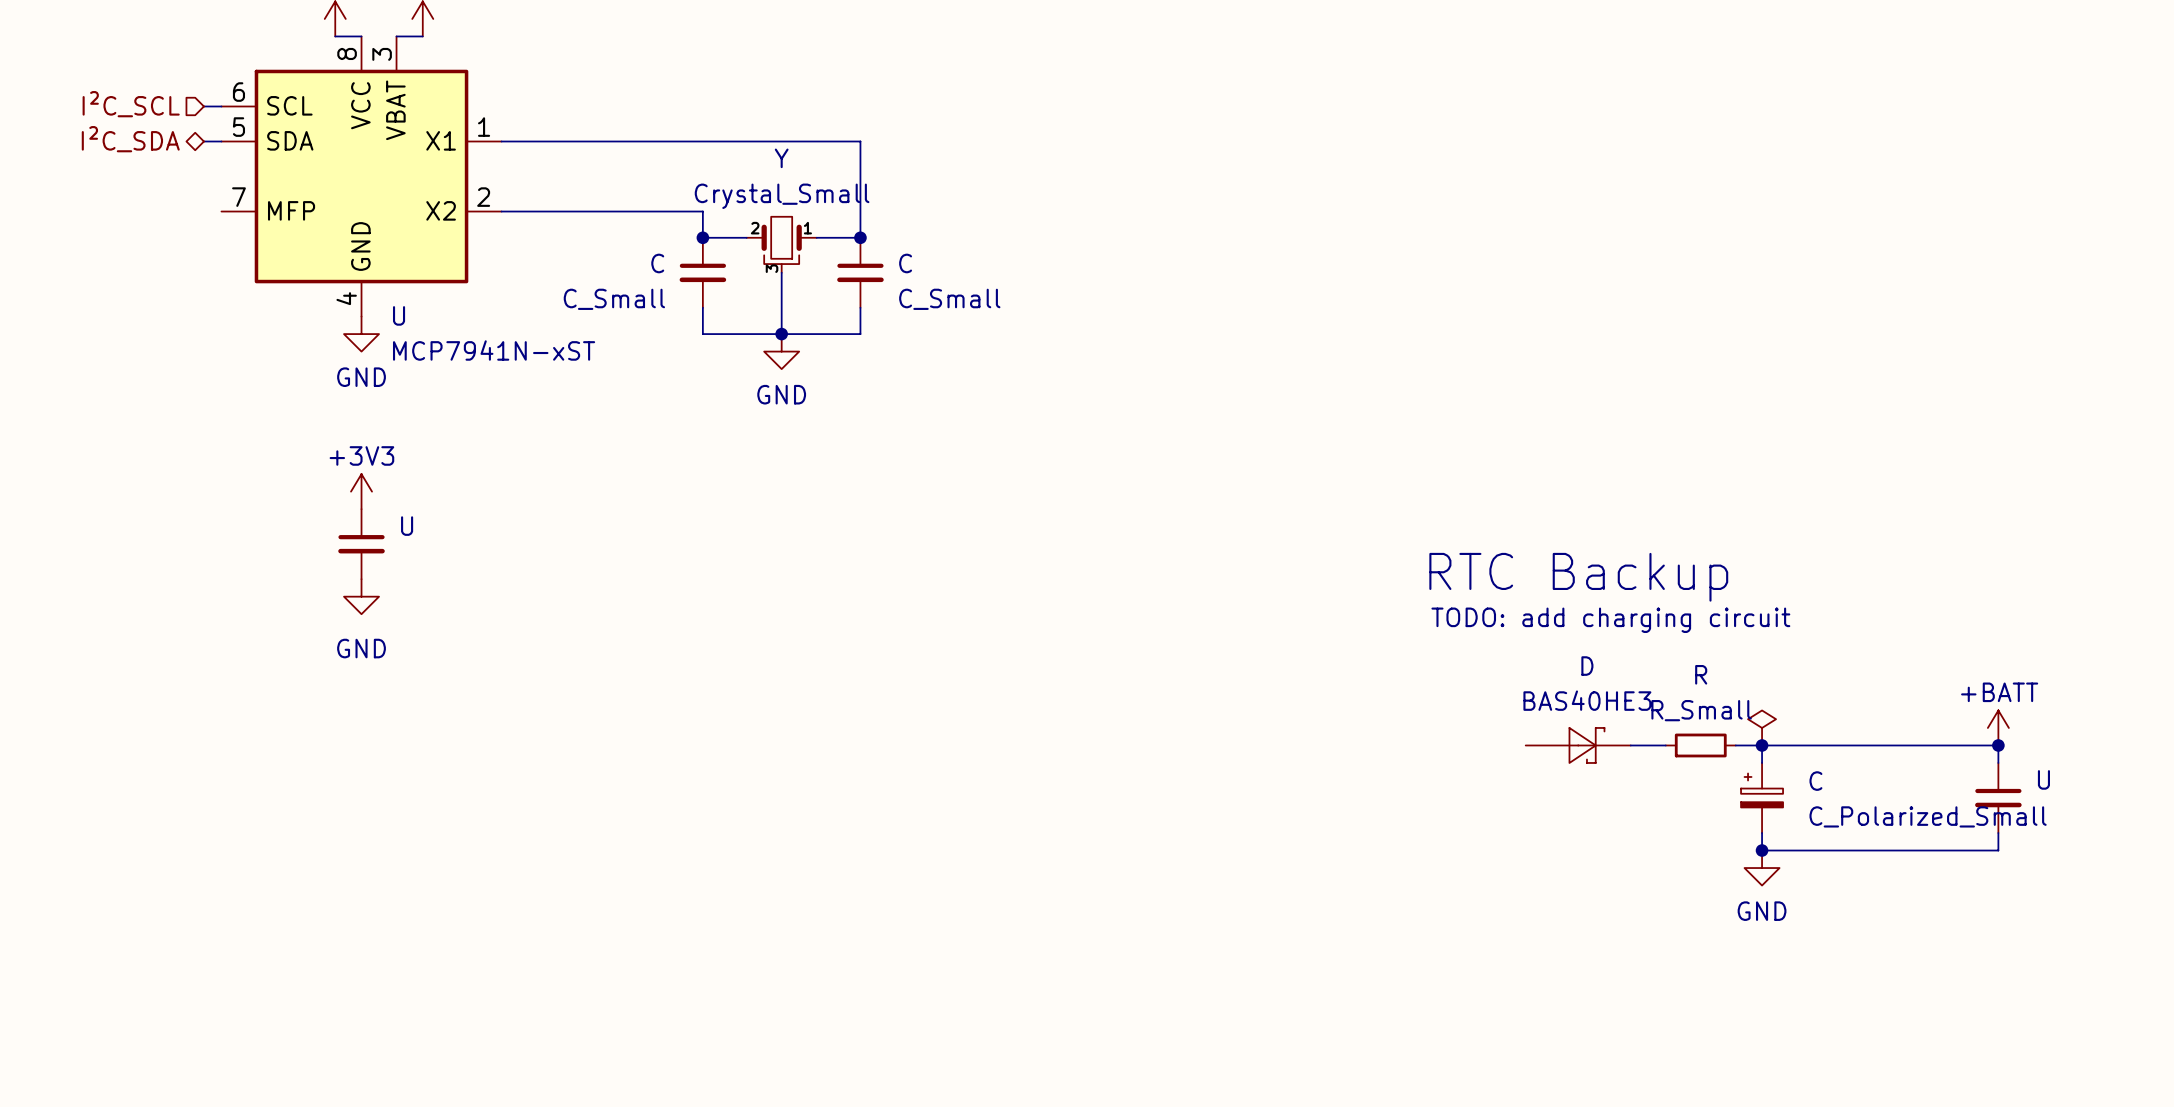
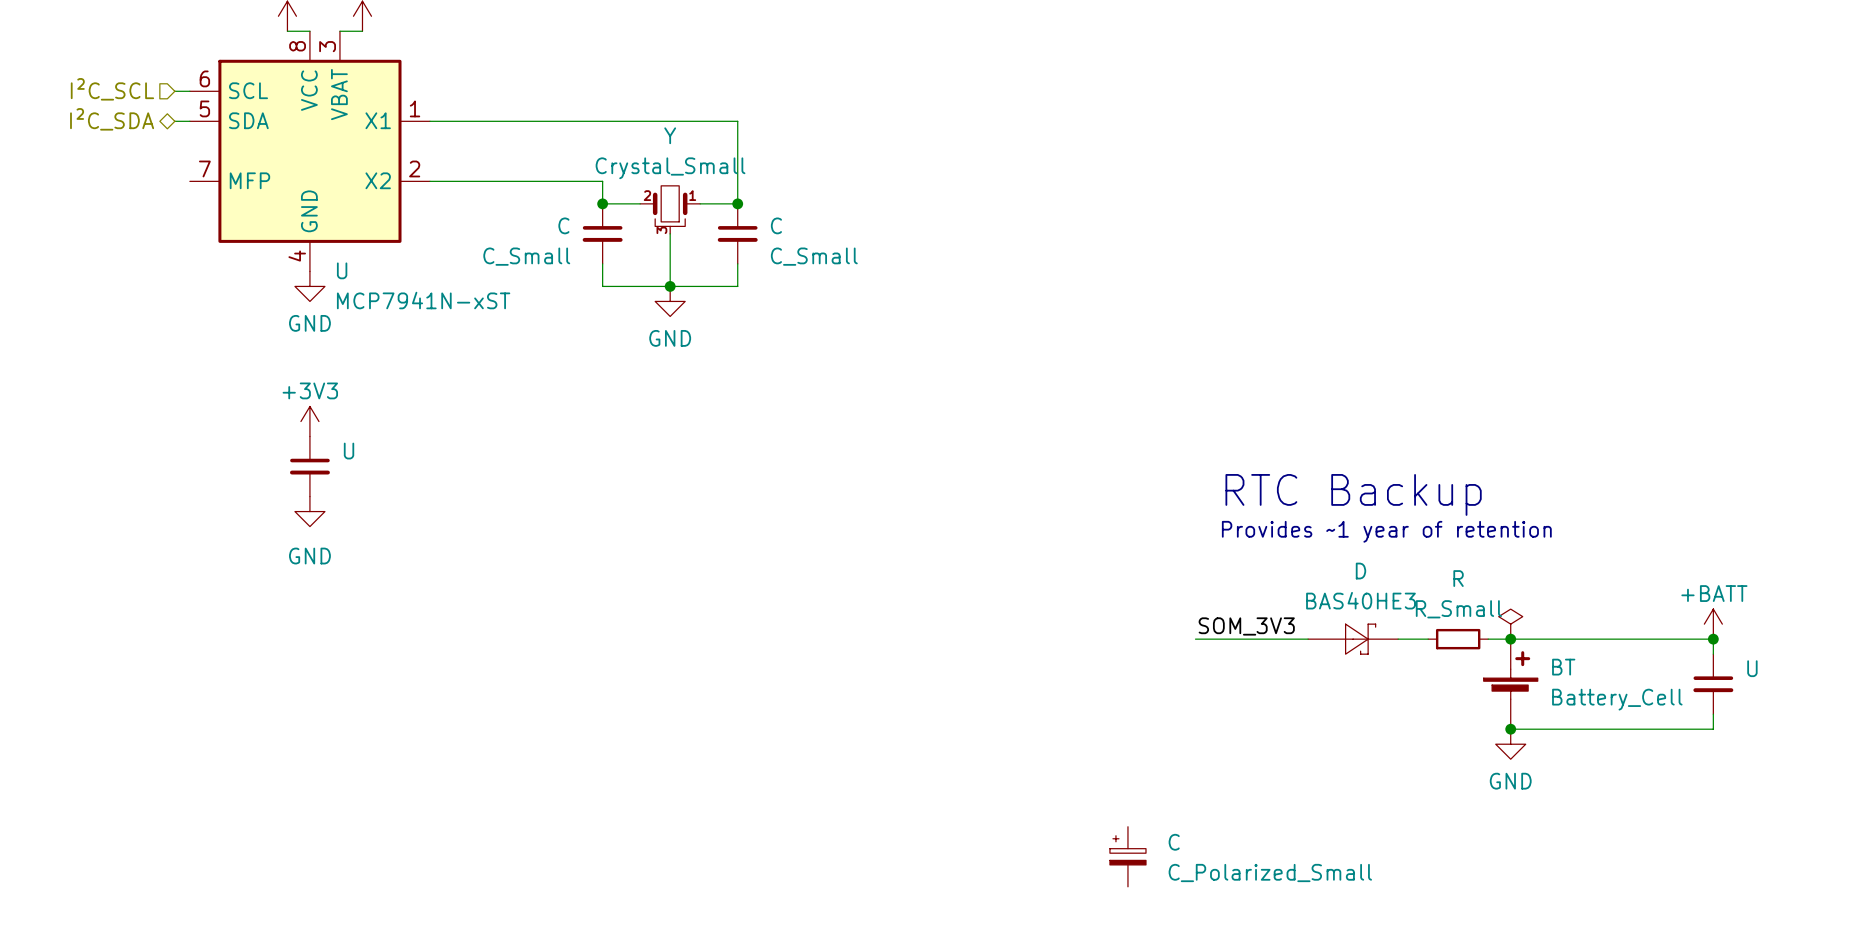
text: TODO: add charging circuit (1610, 620) -> Provides ~1 year of retention (1386, 531)
label: none -> SOM_3V3 (1246, 626)
wire: none -> (1195, 639) (1308, 639)
C: C_Polarized_Small (1762, 798) -> none
BT: none -> Battery_Cell (1510, 684)
C: none -> C_Polarized_Small (1127, 856)

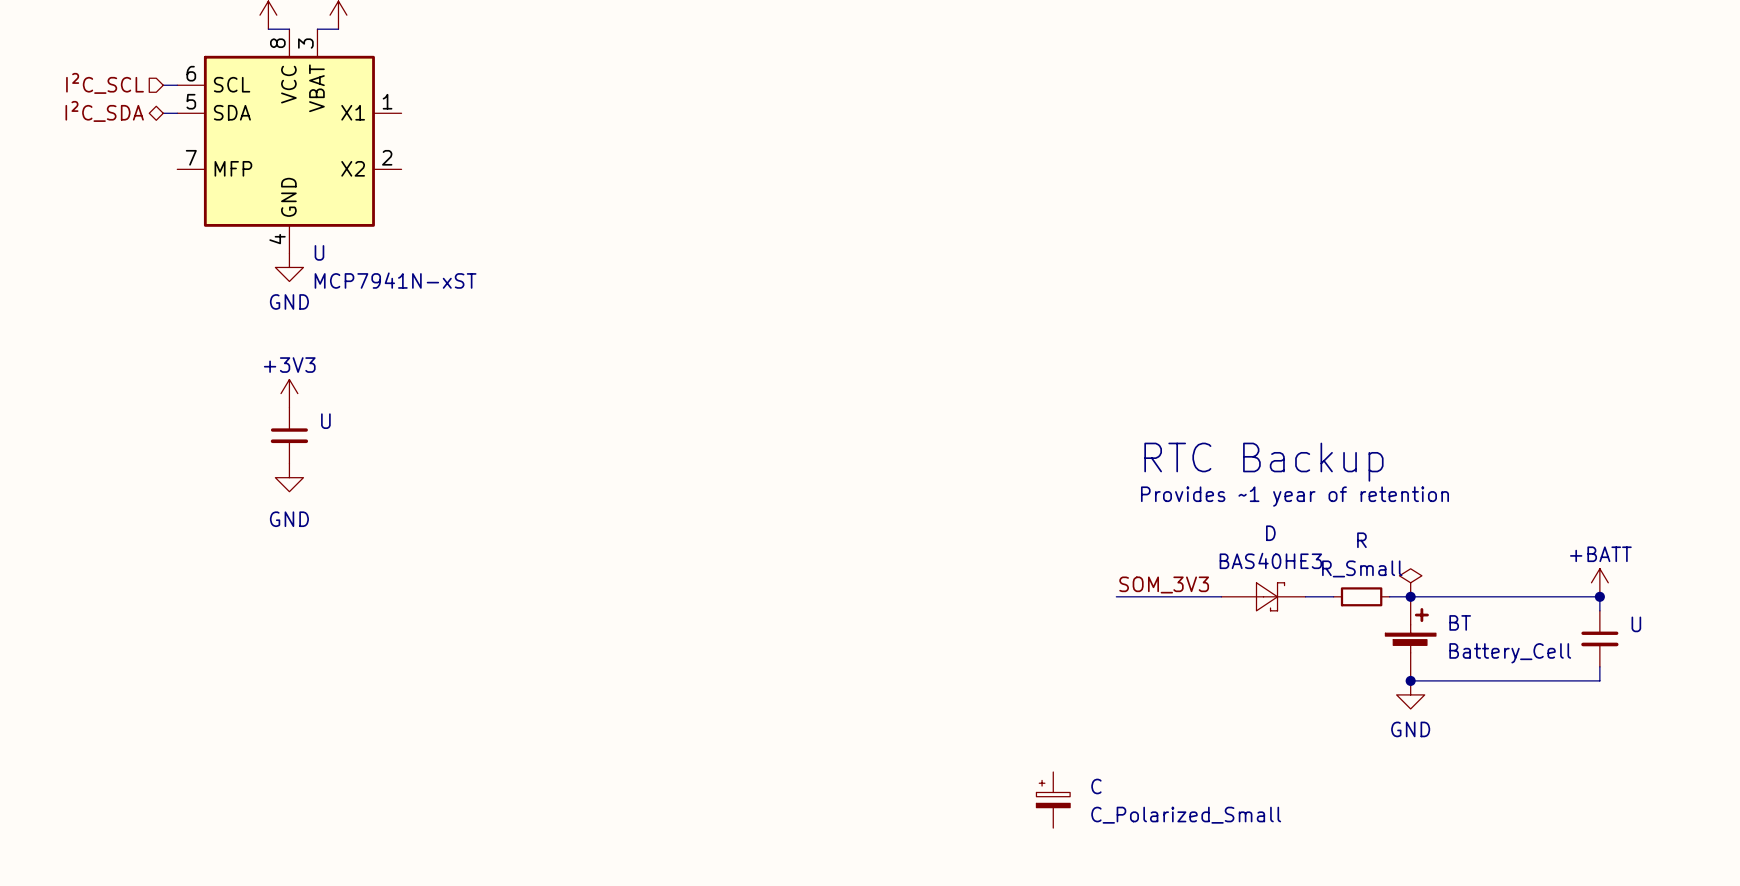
wire: (430, 121) (737, 121) (737, 203) (700, 203) -> none
wire: (430, 181) (602, 181) (602, 203) (640, 203) -> none
junction: (602, 203) -> none
junction: (737, 203) -> none
Y: Crystal_Small (670, 209) -> none
C: C_Small (602, 233) -> none
wire: (670, 233) (670, 286) -> none
C: C_Small (737, 233) -> none
wire: (602, 263) (602, 286) (737, 286) (737, 263) -> none
junction: (670, 286) -> none
power symbol: GND (670, 301) -> none

